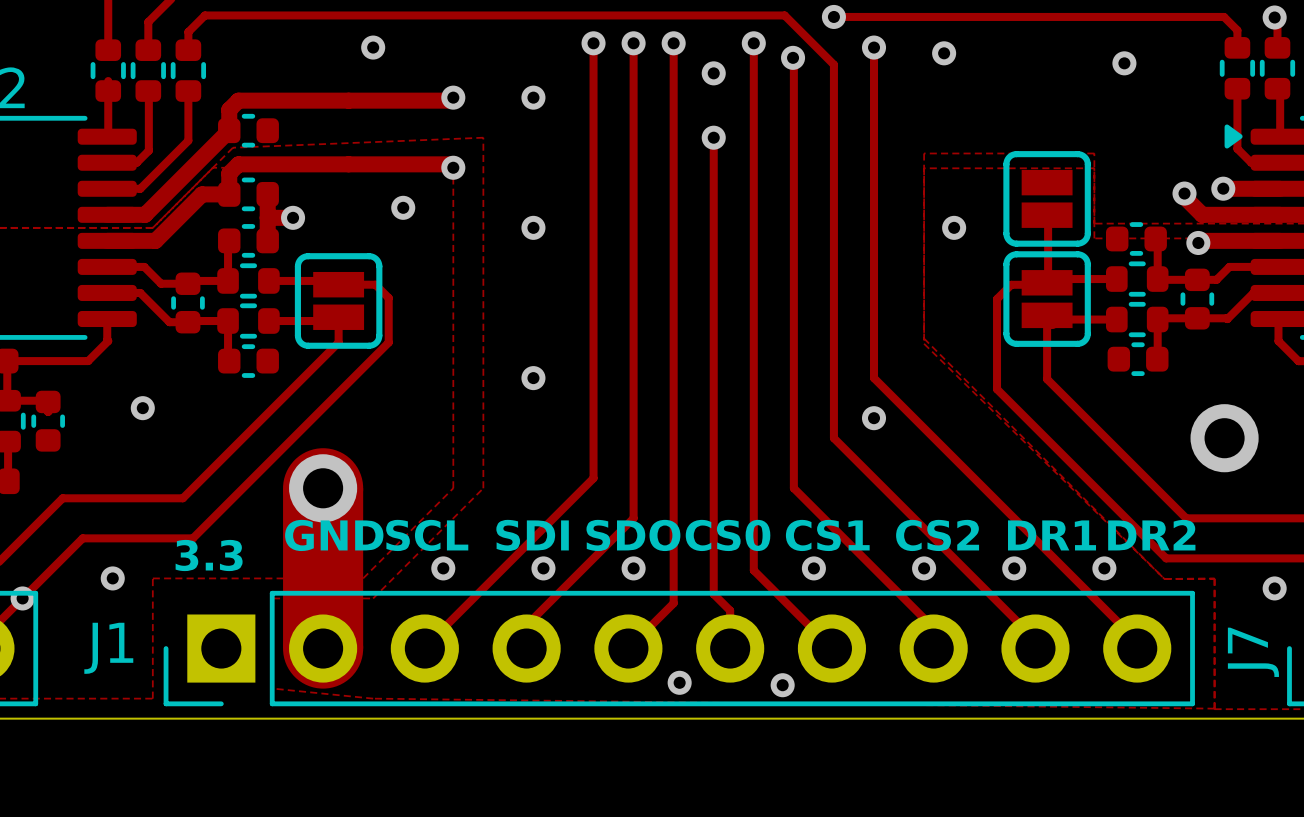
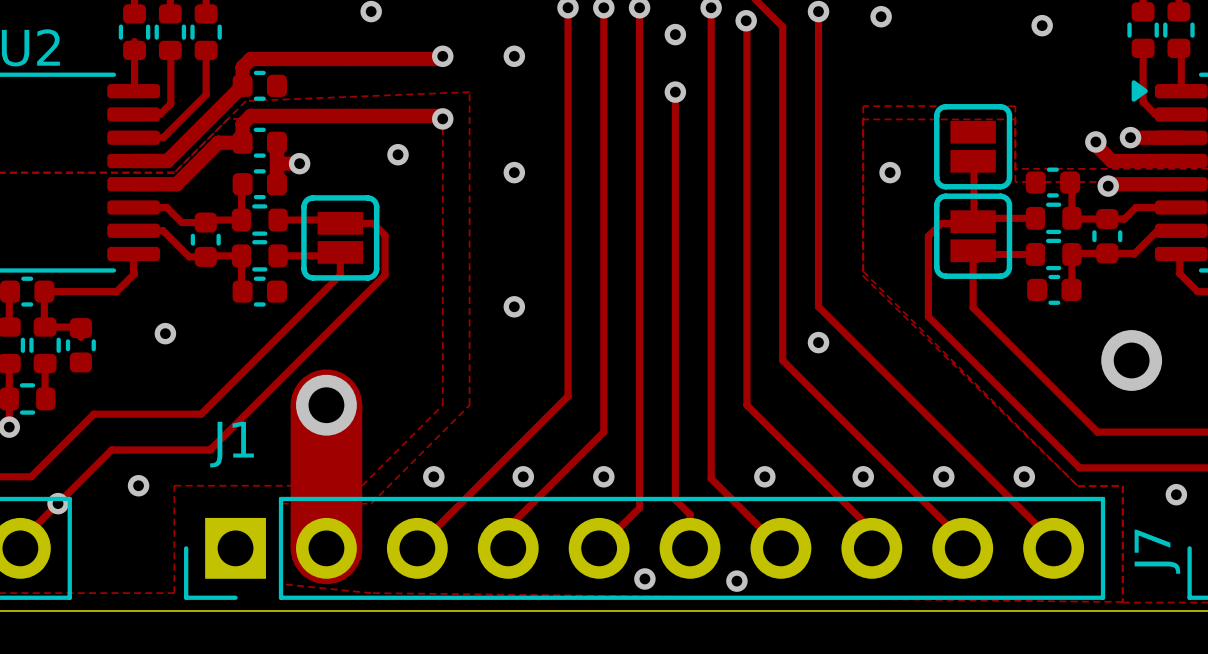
text: GND (334, 535) -> none
text: SCL (427, 535) -> none
text: SDI (532, 535) -> none
text: SDO (633, 535) -> none
text: CS0 (728, 535) -> none
text: CS1 (827, 535) -> none
text: CS2 (937, 535) -> none
text: DR1 (1052, 535) -> none
text: DR2 (1151, 535) -> none
text: 3.3 (209, 555) -> none
J1 name position: J1 (108, 648) -> J1 (232, 444)

